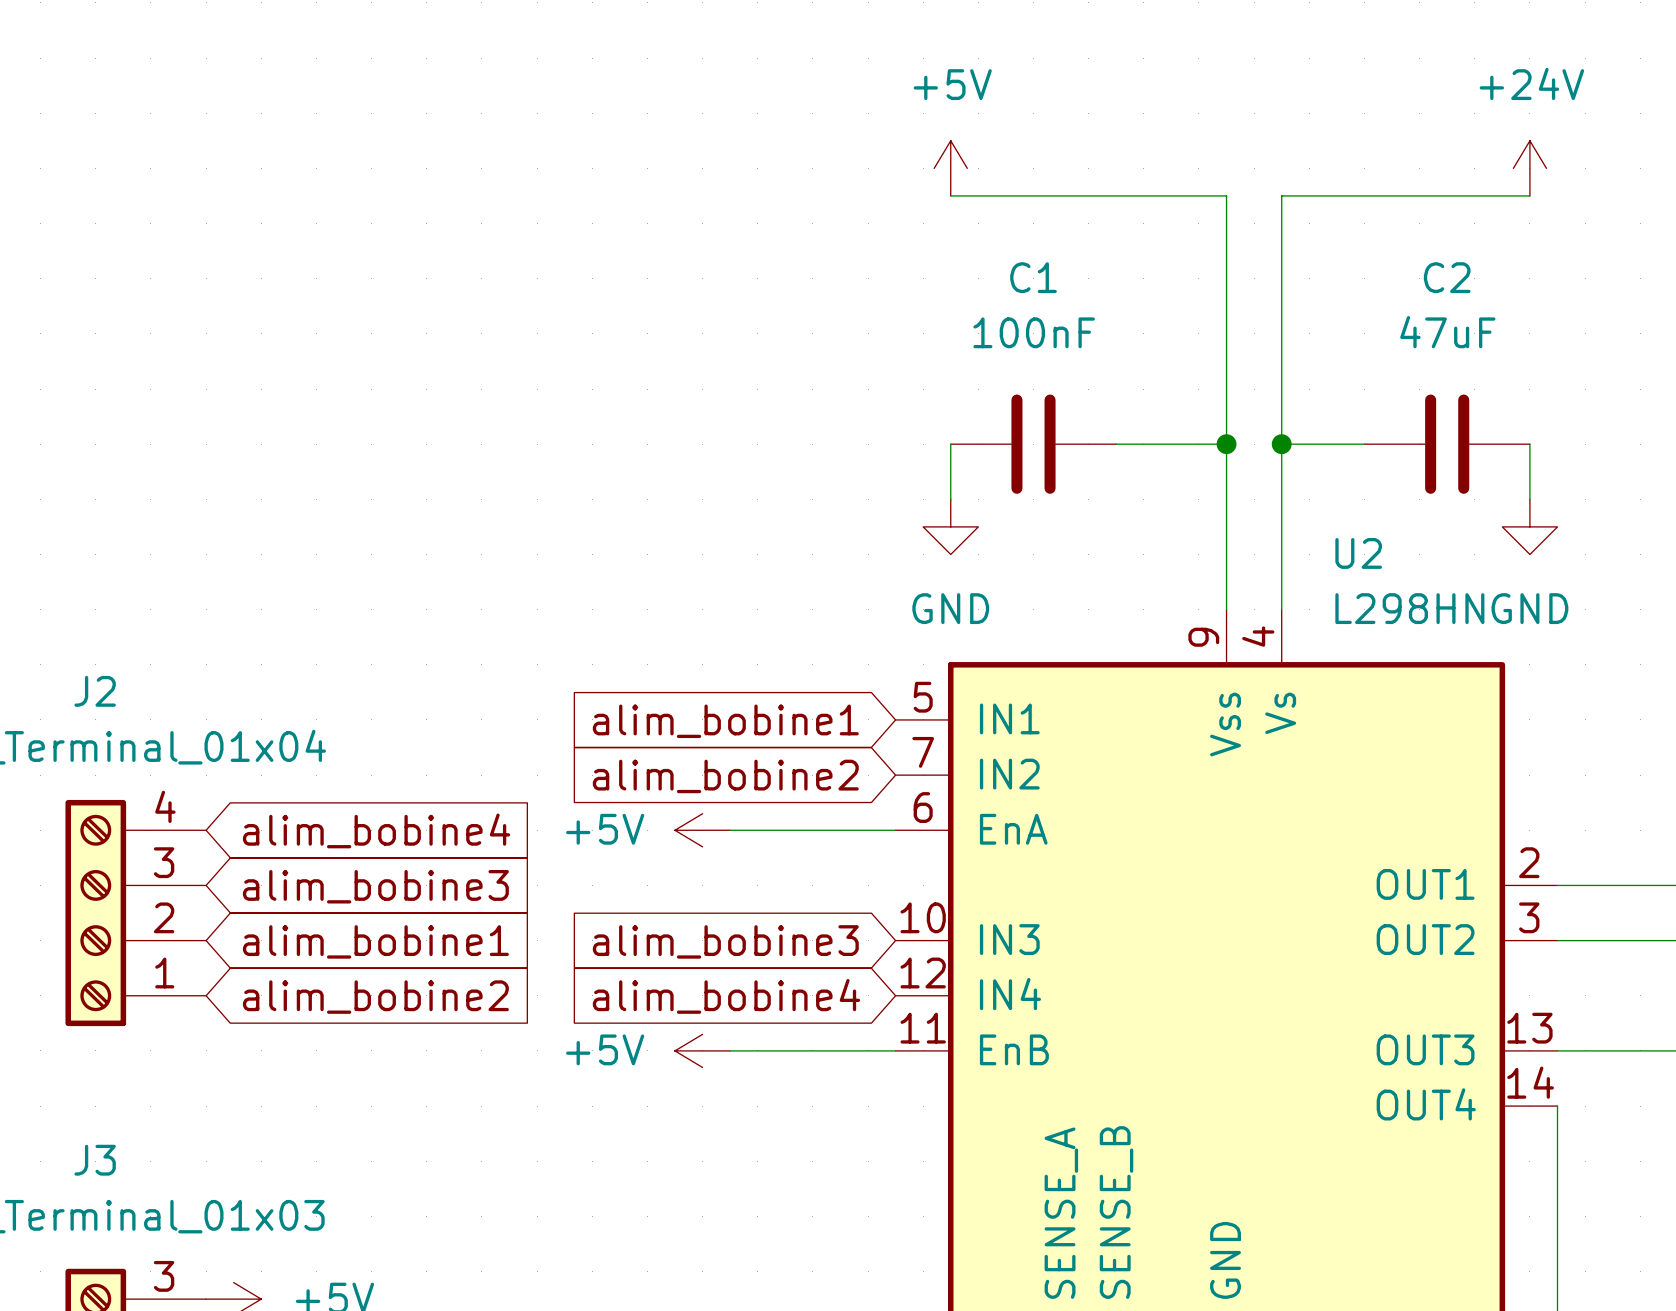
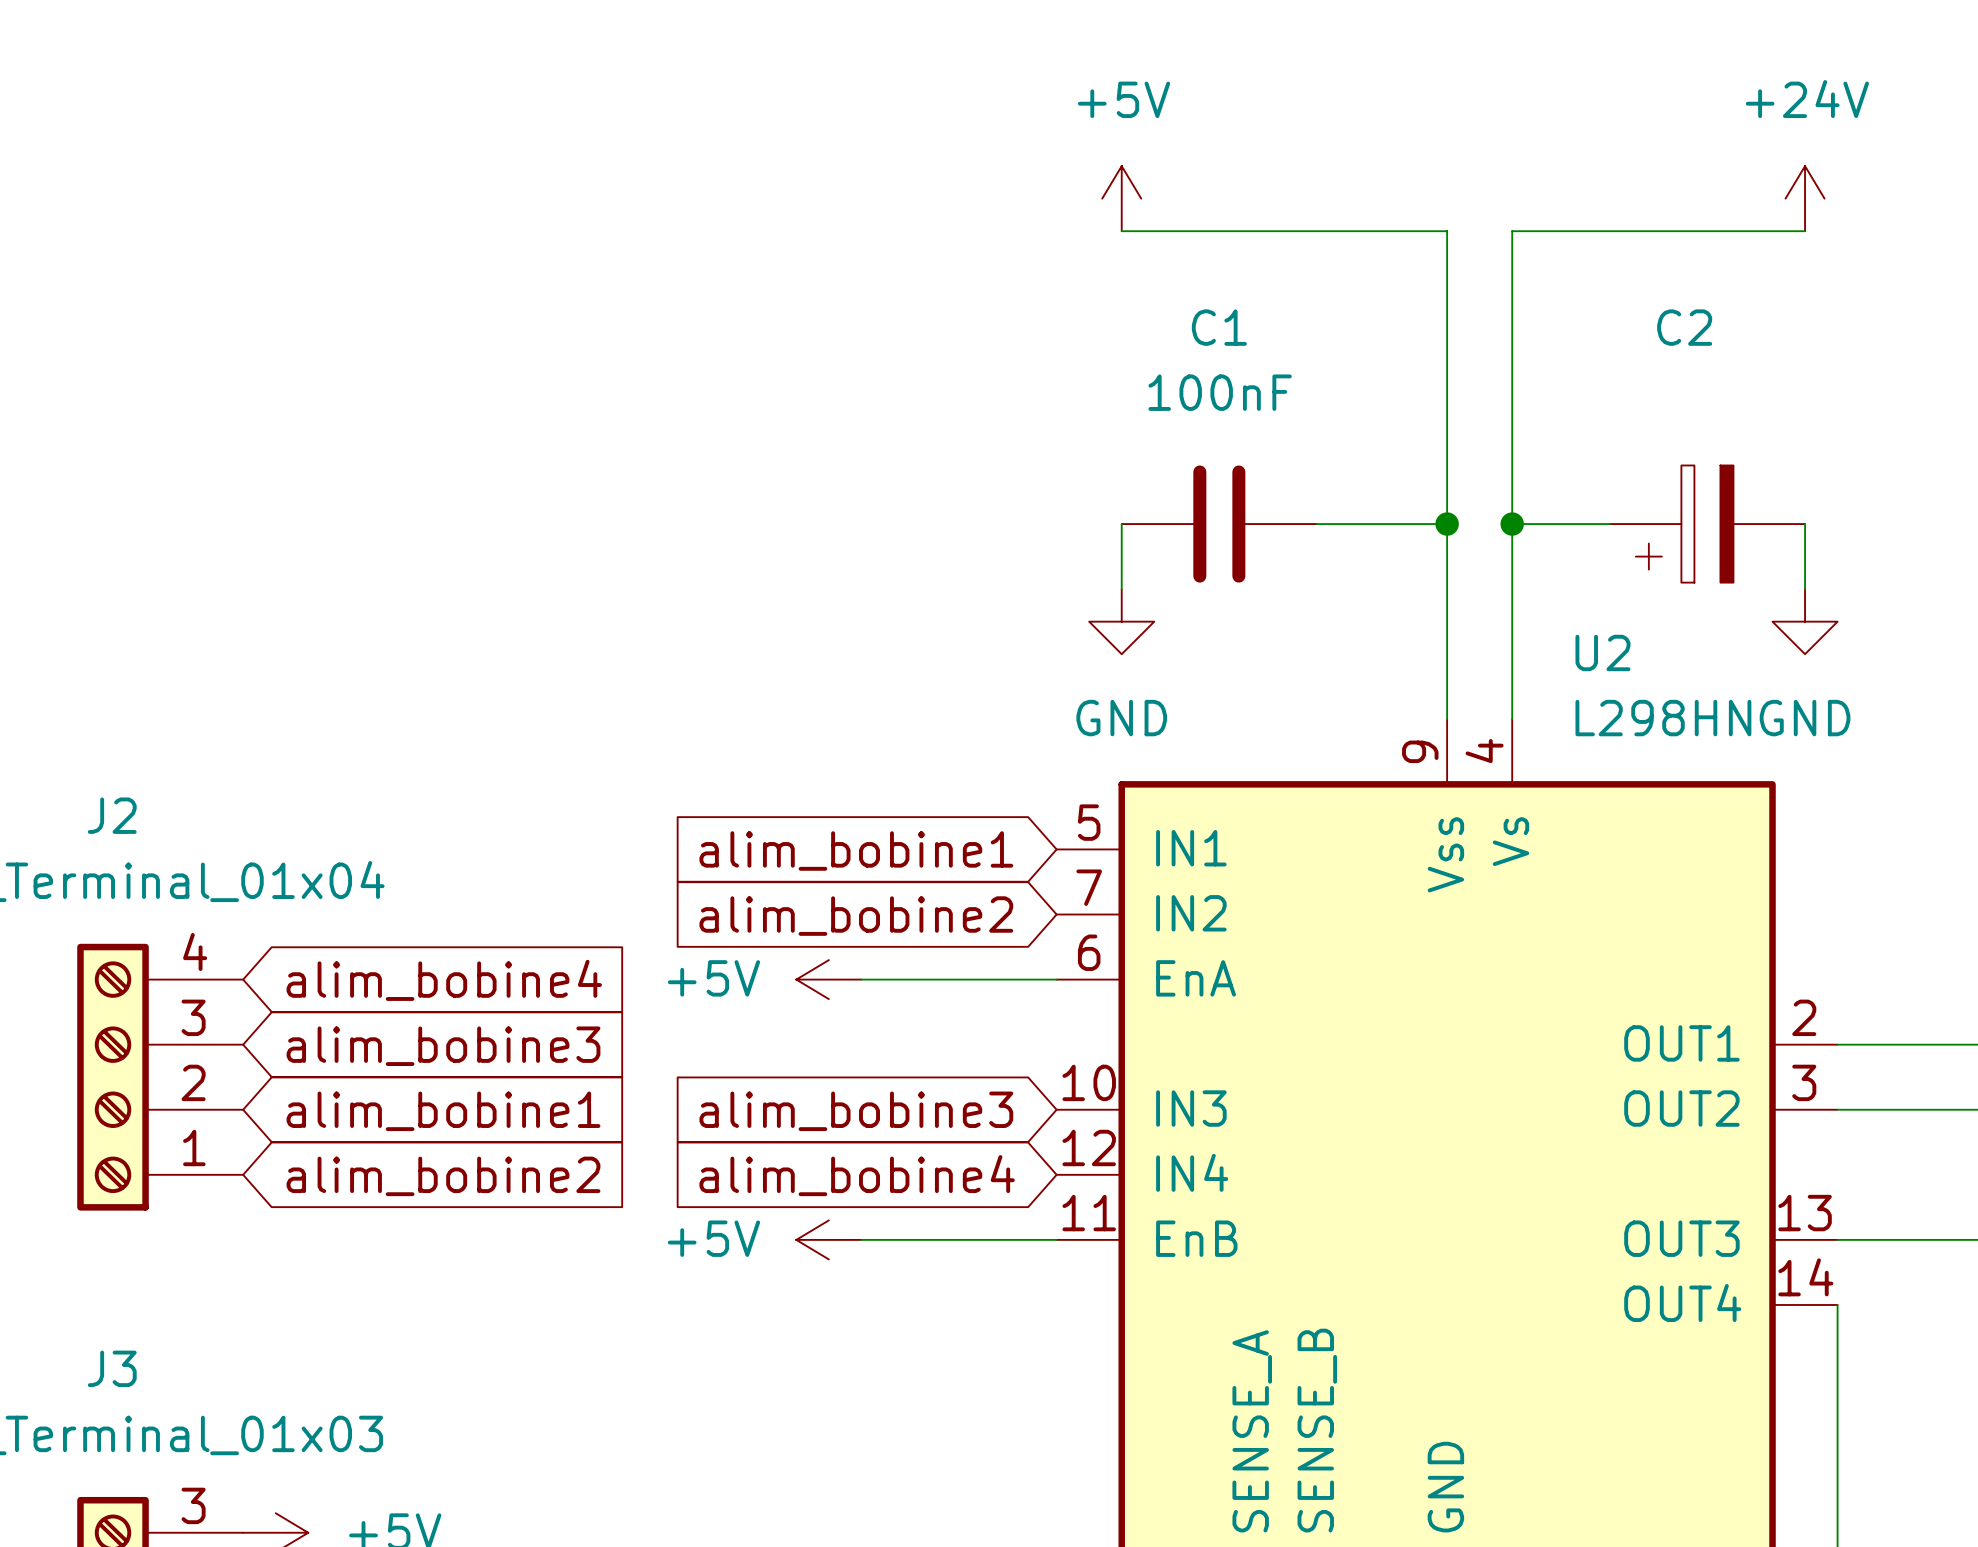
C2 value: 47uF (1447, 332) -> none
C2 symbol: [1364, 394, 1530, 494] -> [1609, 465, 1806, 583]

